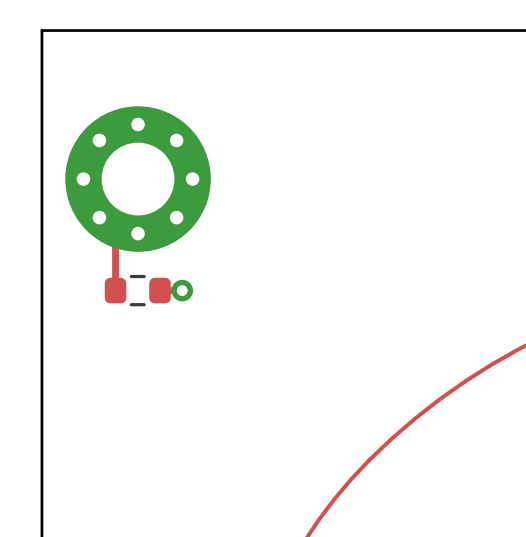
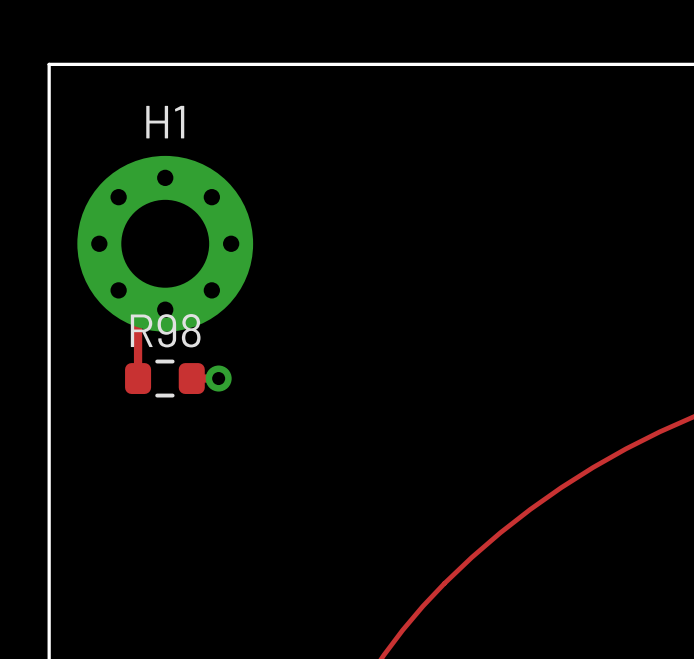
H1 name: none -> H1 (165, 122)
R98 name: none -> R98 (165, 330)

